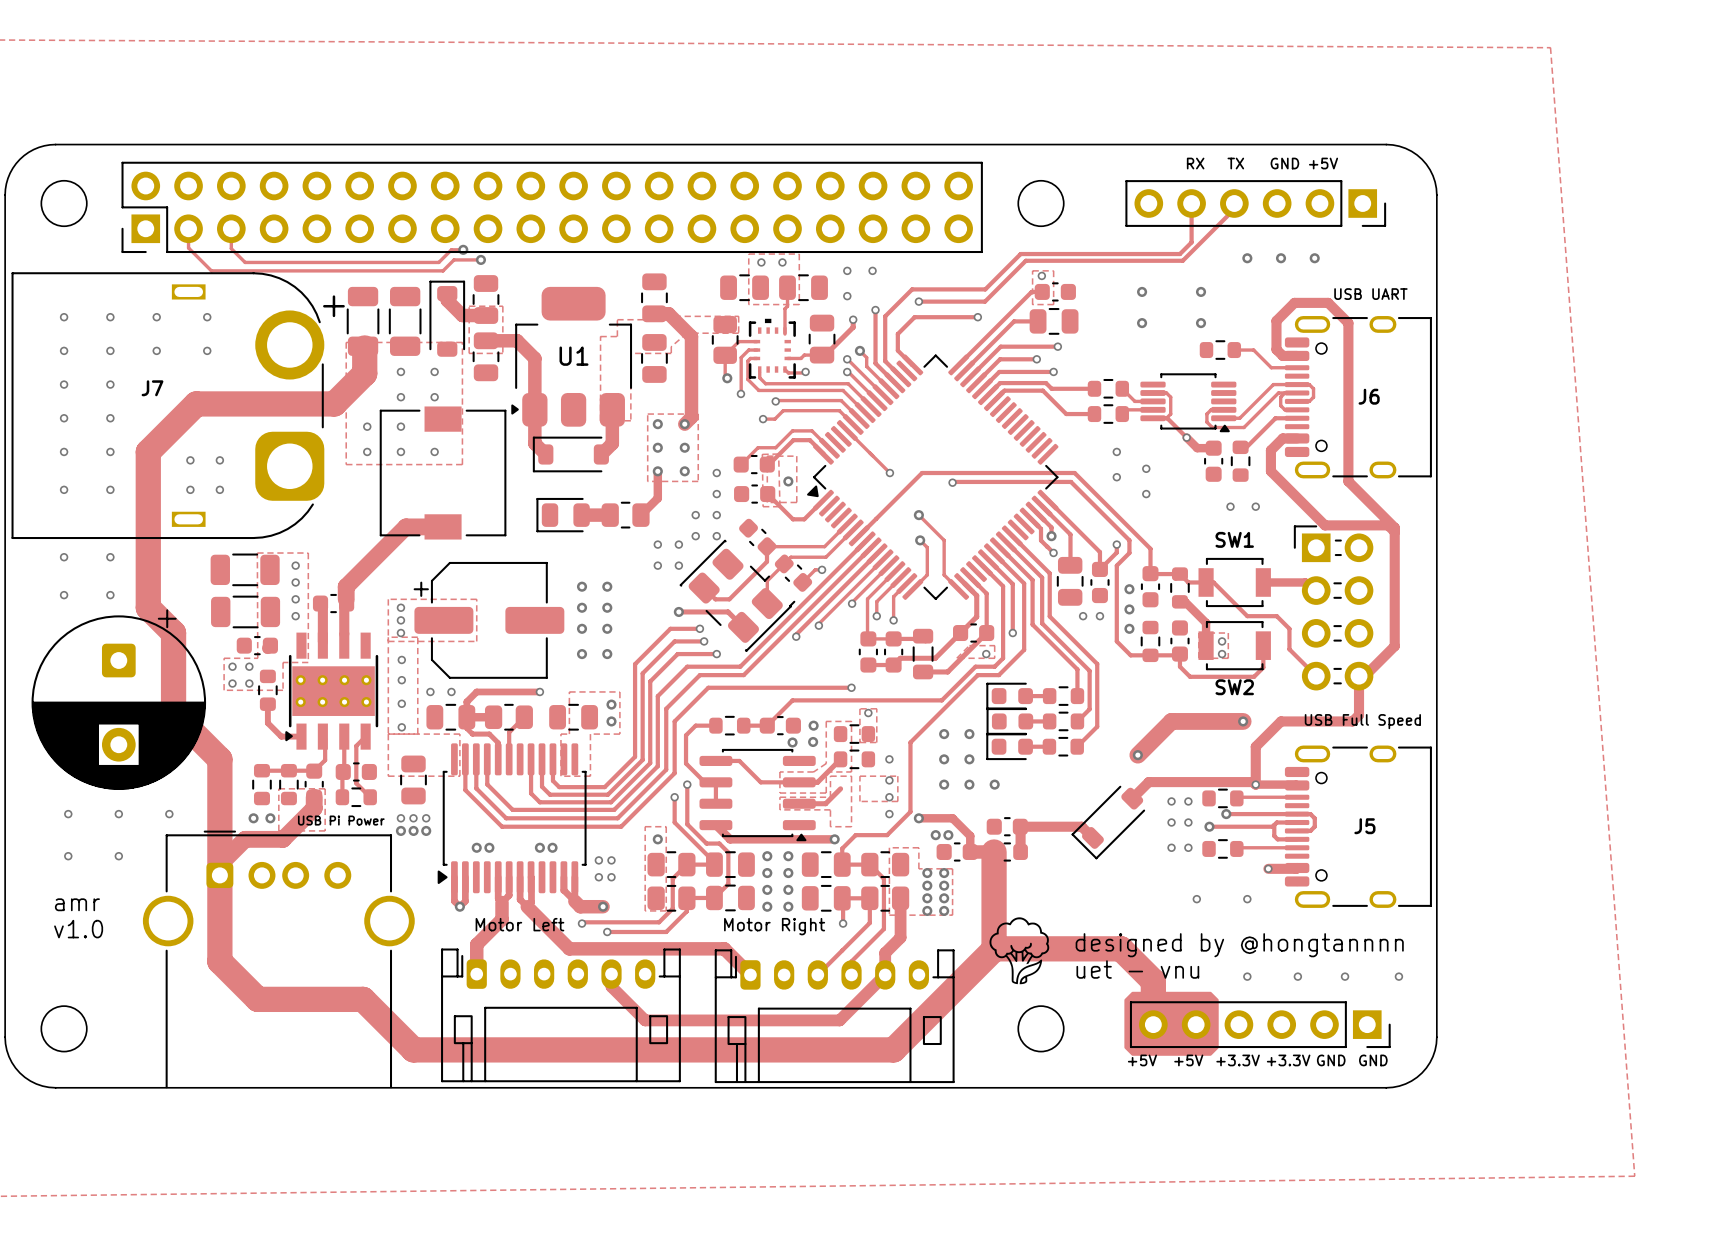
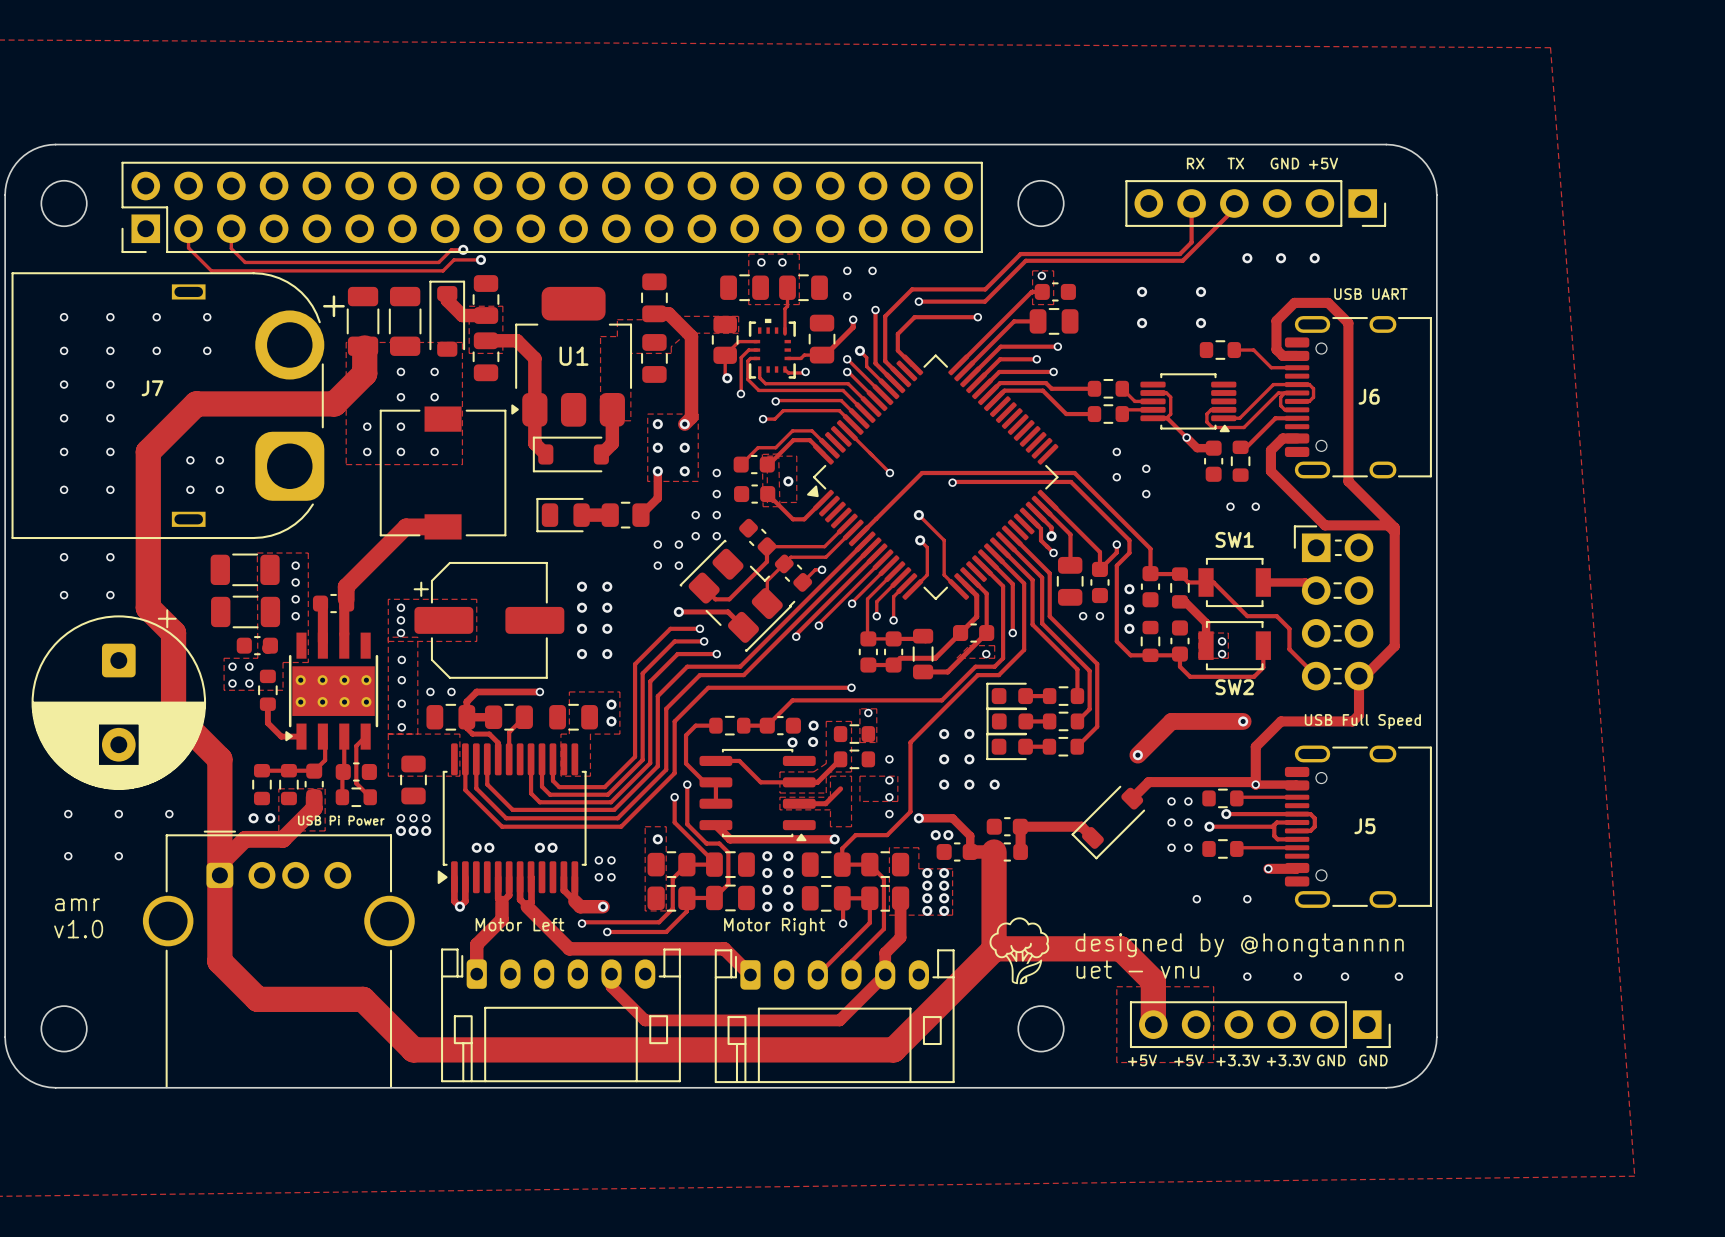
zone outline: none -> (1116, 986) (1116, 1062) (1213, 1062) (1213, 986) (1116, 986)
drawing: [1124, 991, 1219, 1056] -> none

